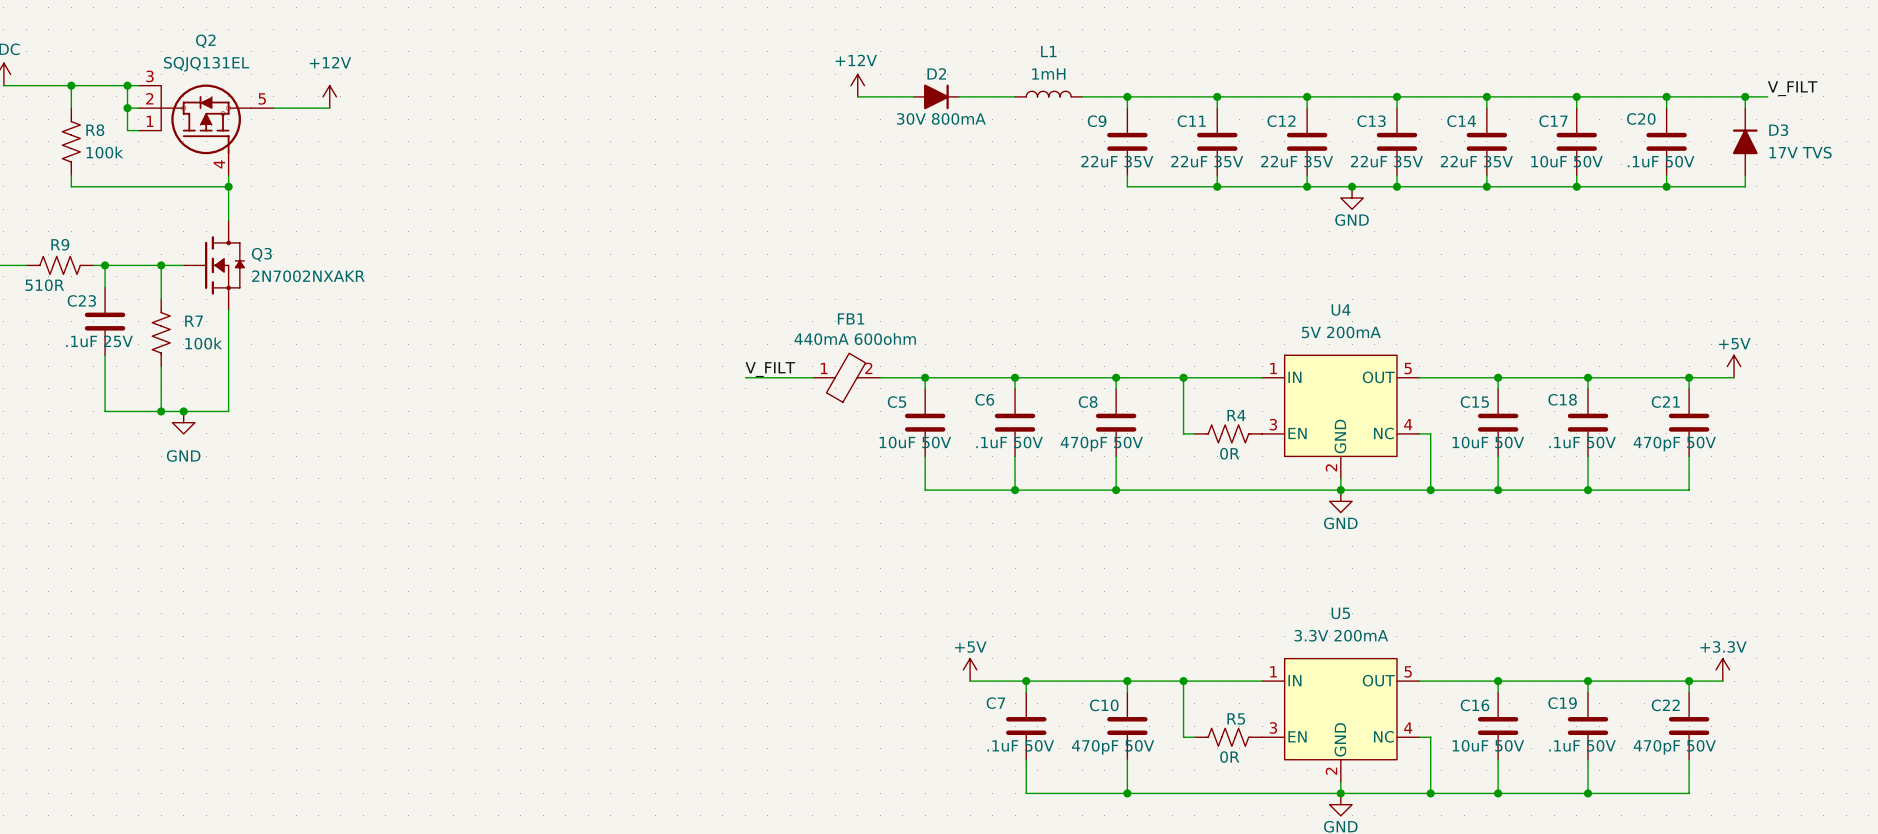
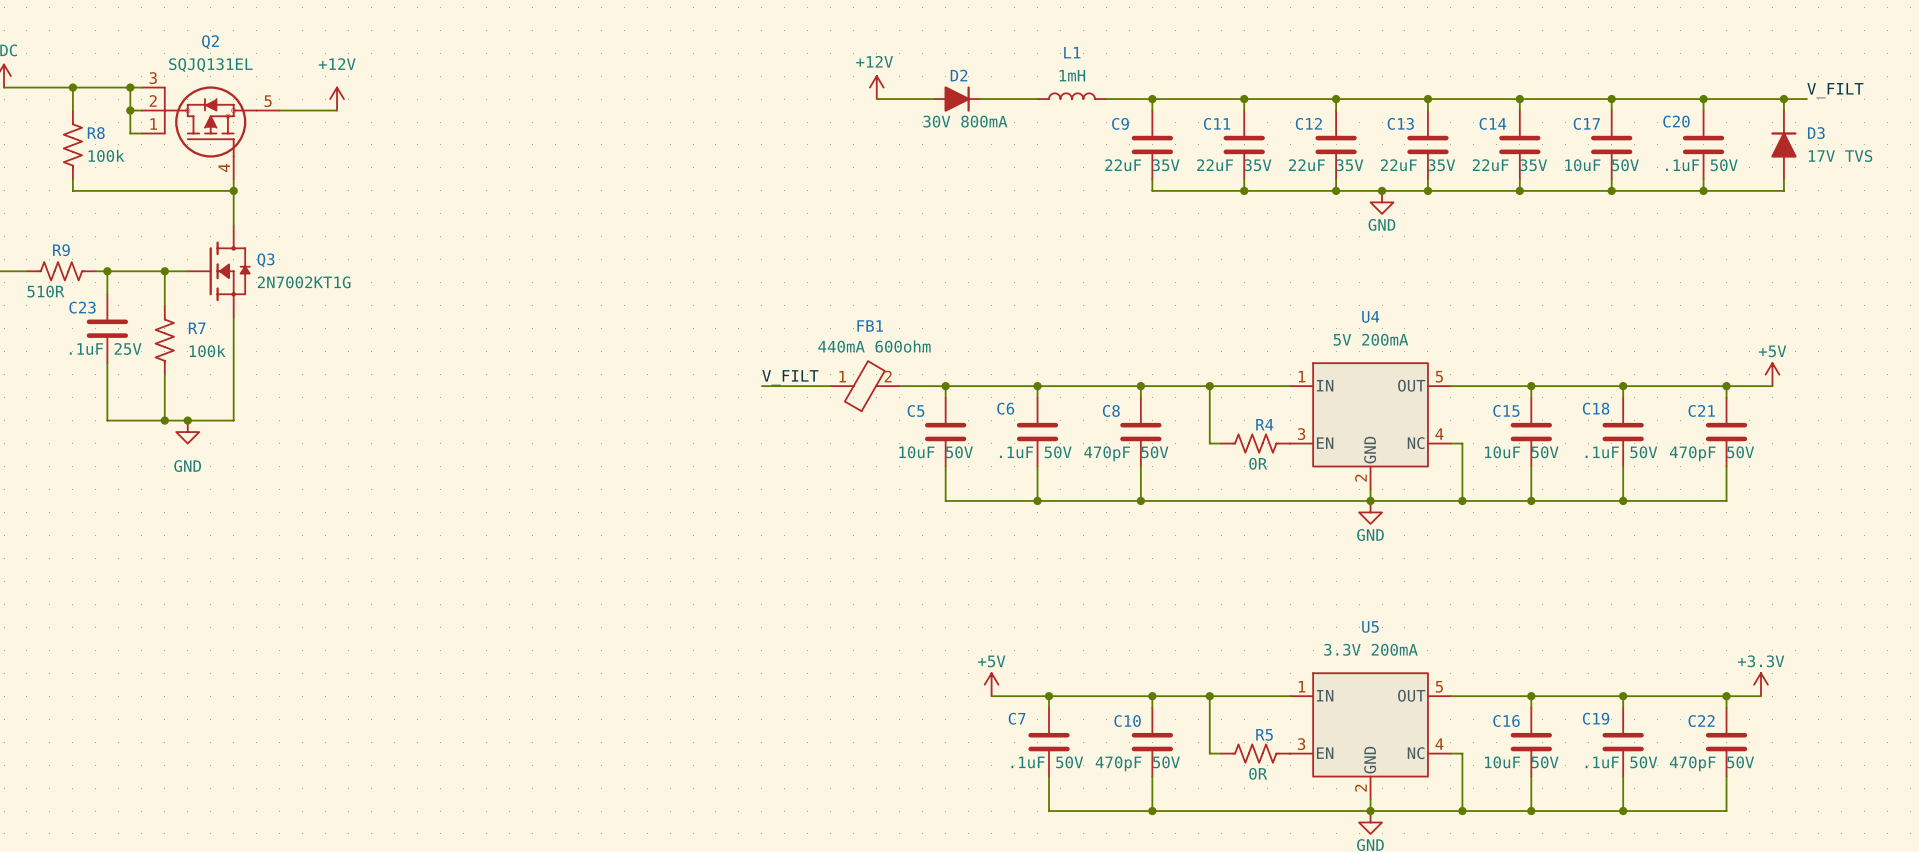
Q3 value: 2N7002NXAKR (308, 276) -> 2N7002KT1G (304, 282)

